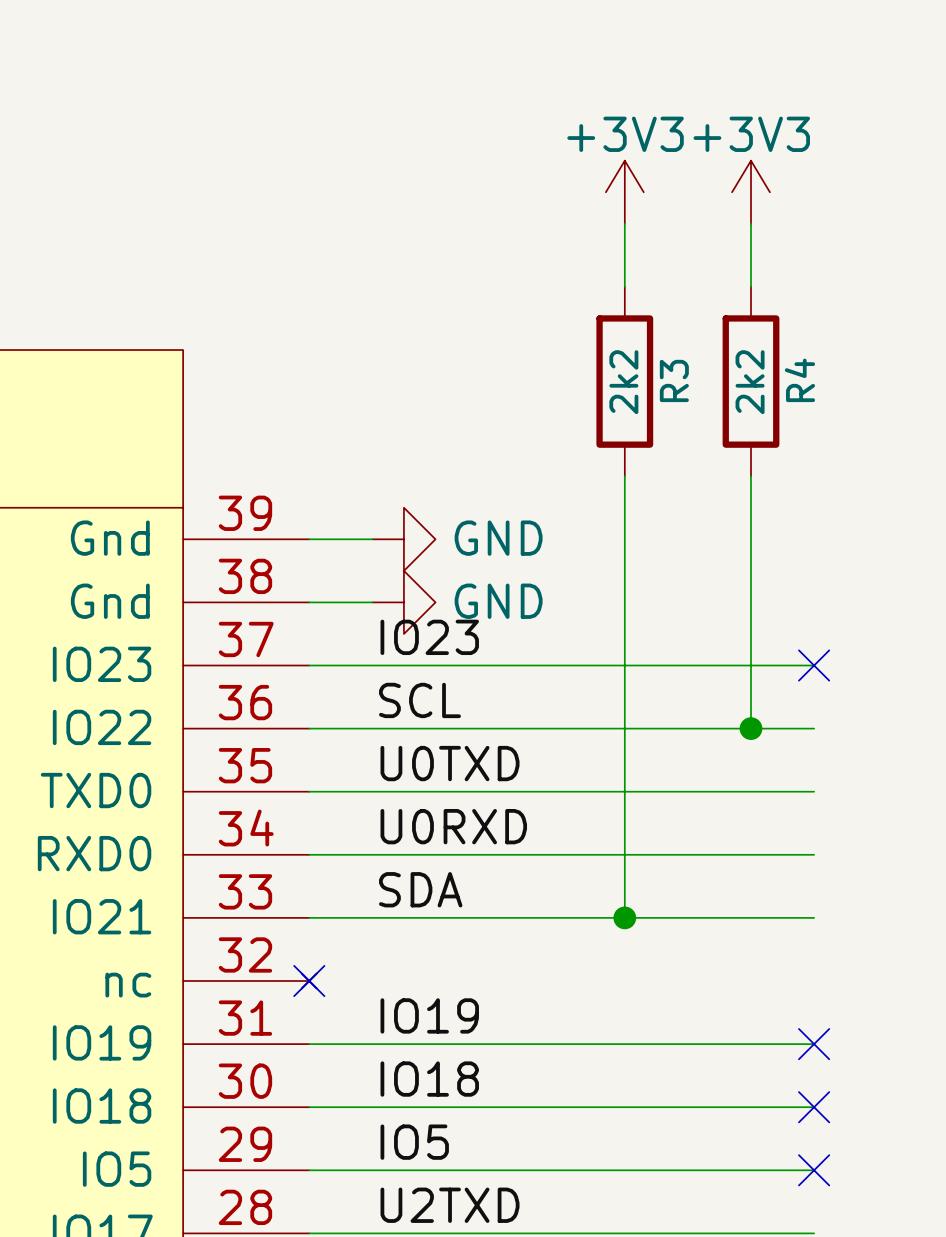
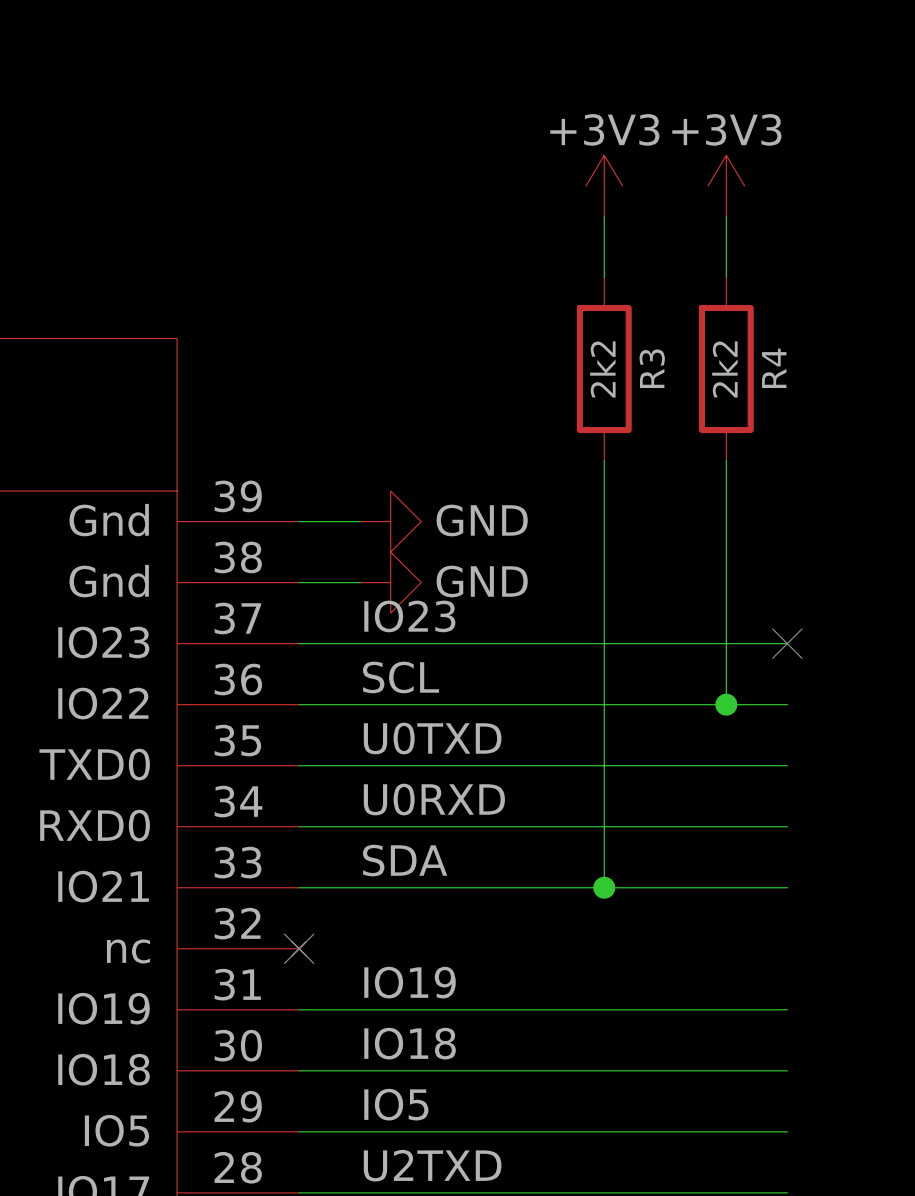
no-connect mark: (814, 1044) -> none
no-connect mark: (814, 1107) -> none
no-connect mark: (814, 1170) -> none

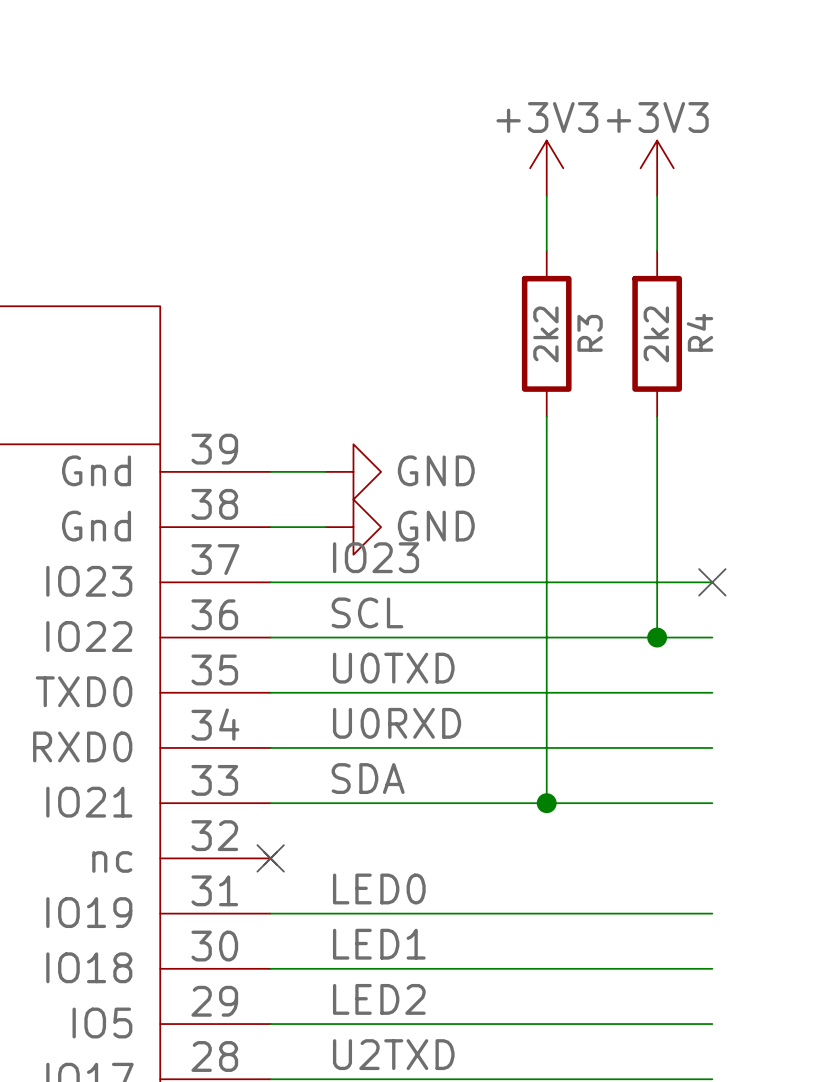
label: IO19 (410, 982) -> LED0 (379, 888)
label: IO18 (410, 1043) -> LED1 (379, 944)
label: IO5 (396, 1104) -> LED2 (379, 999)

